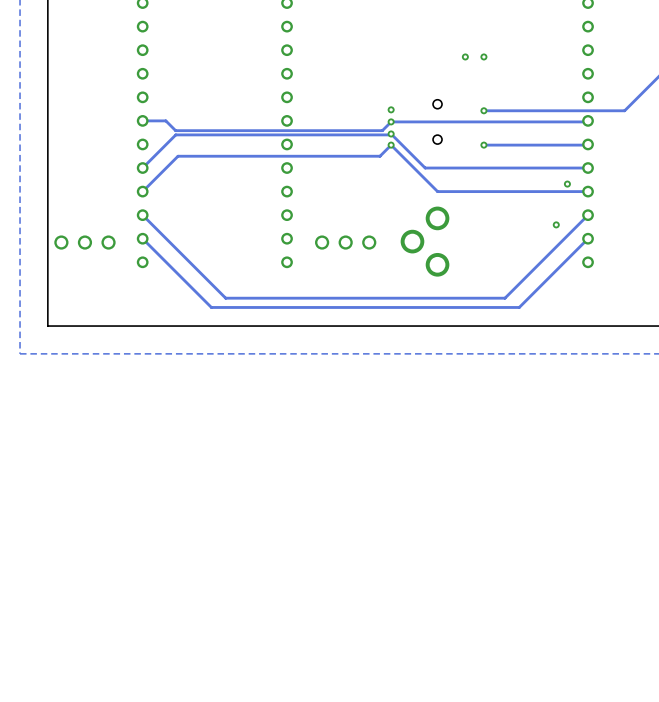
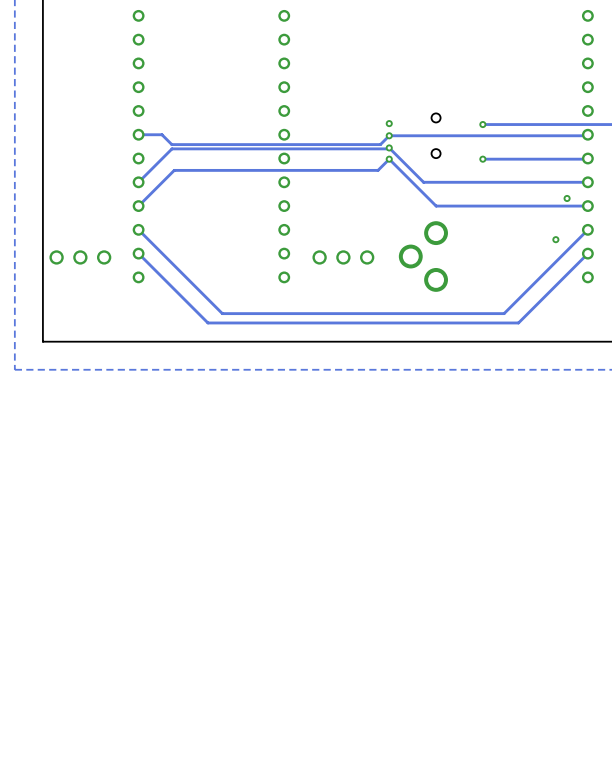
via: (465, 56) -> none
via: (483, 56) -> none

